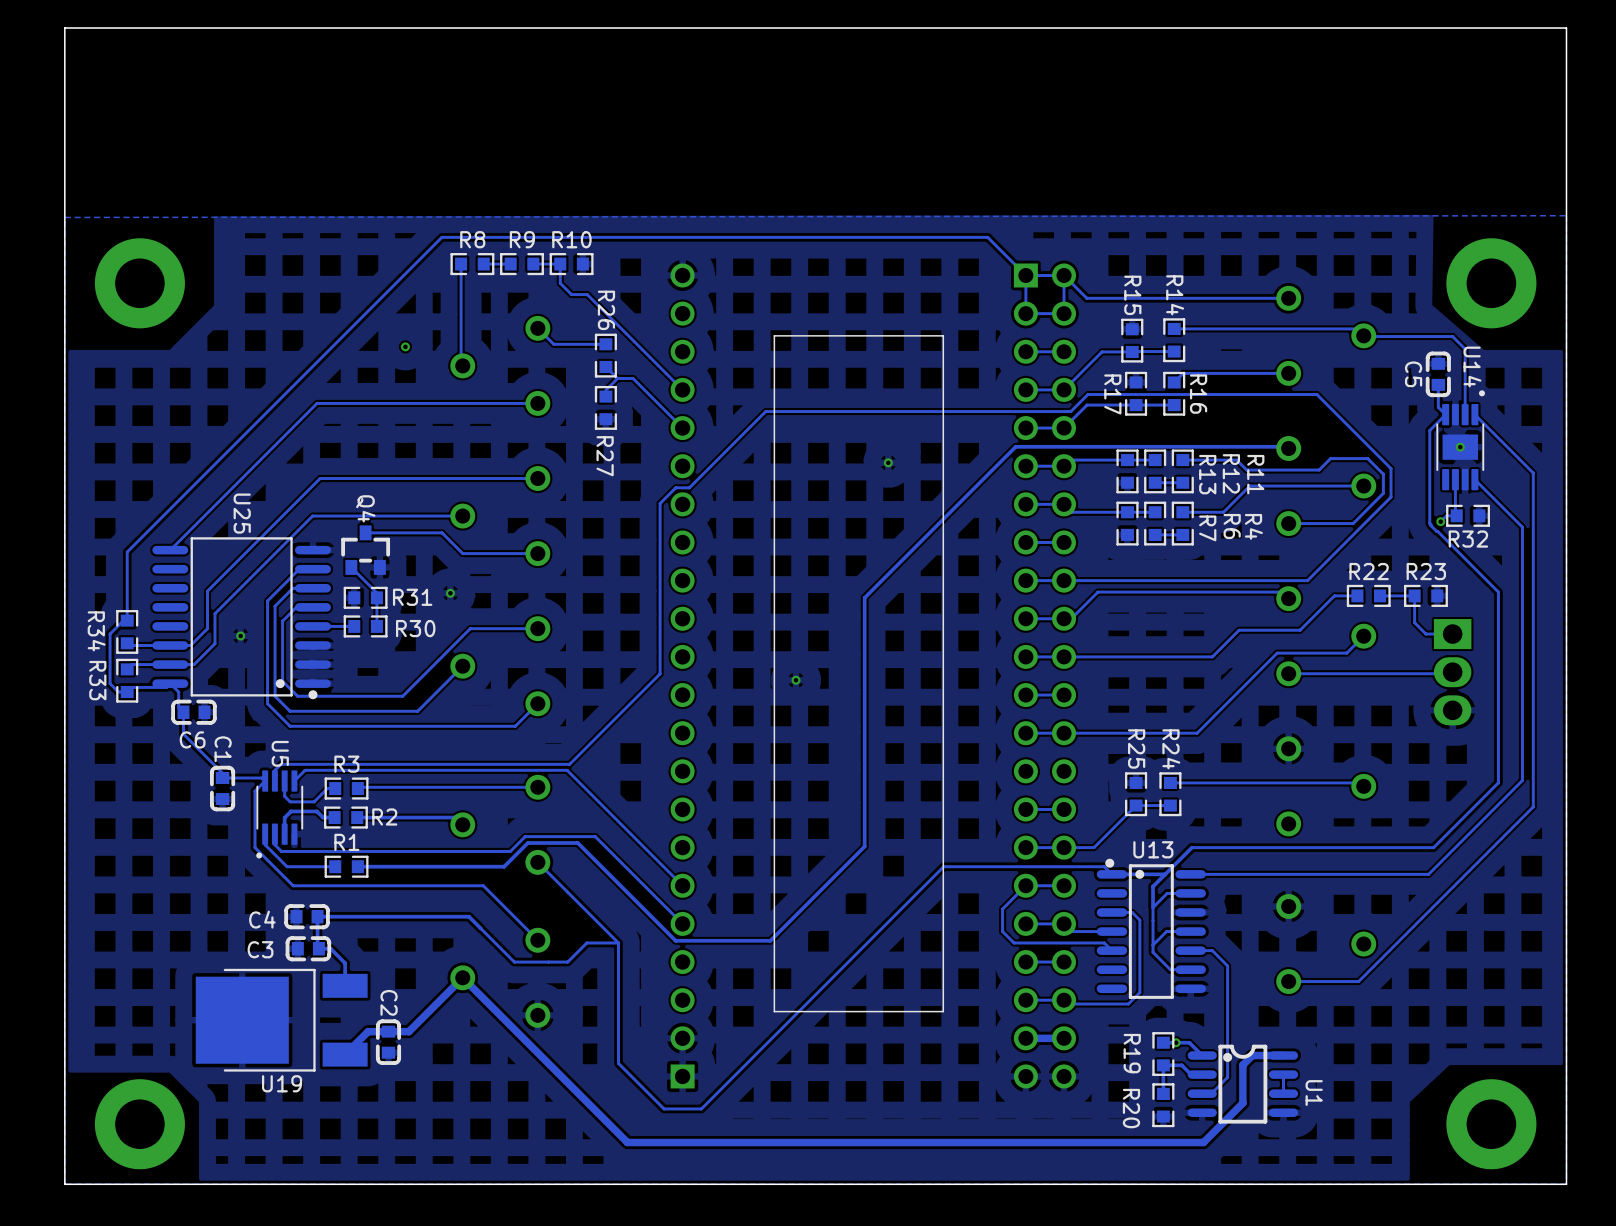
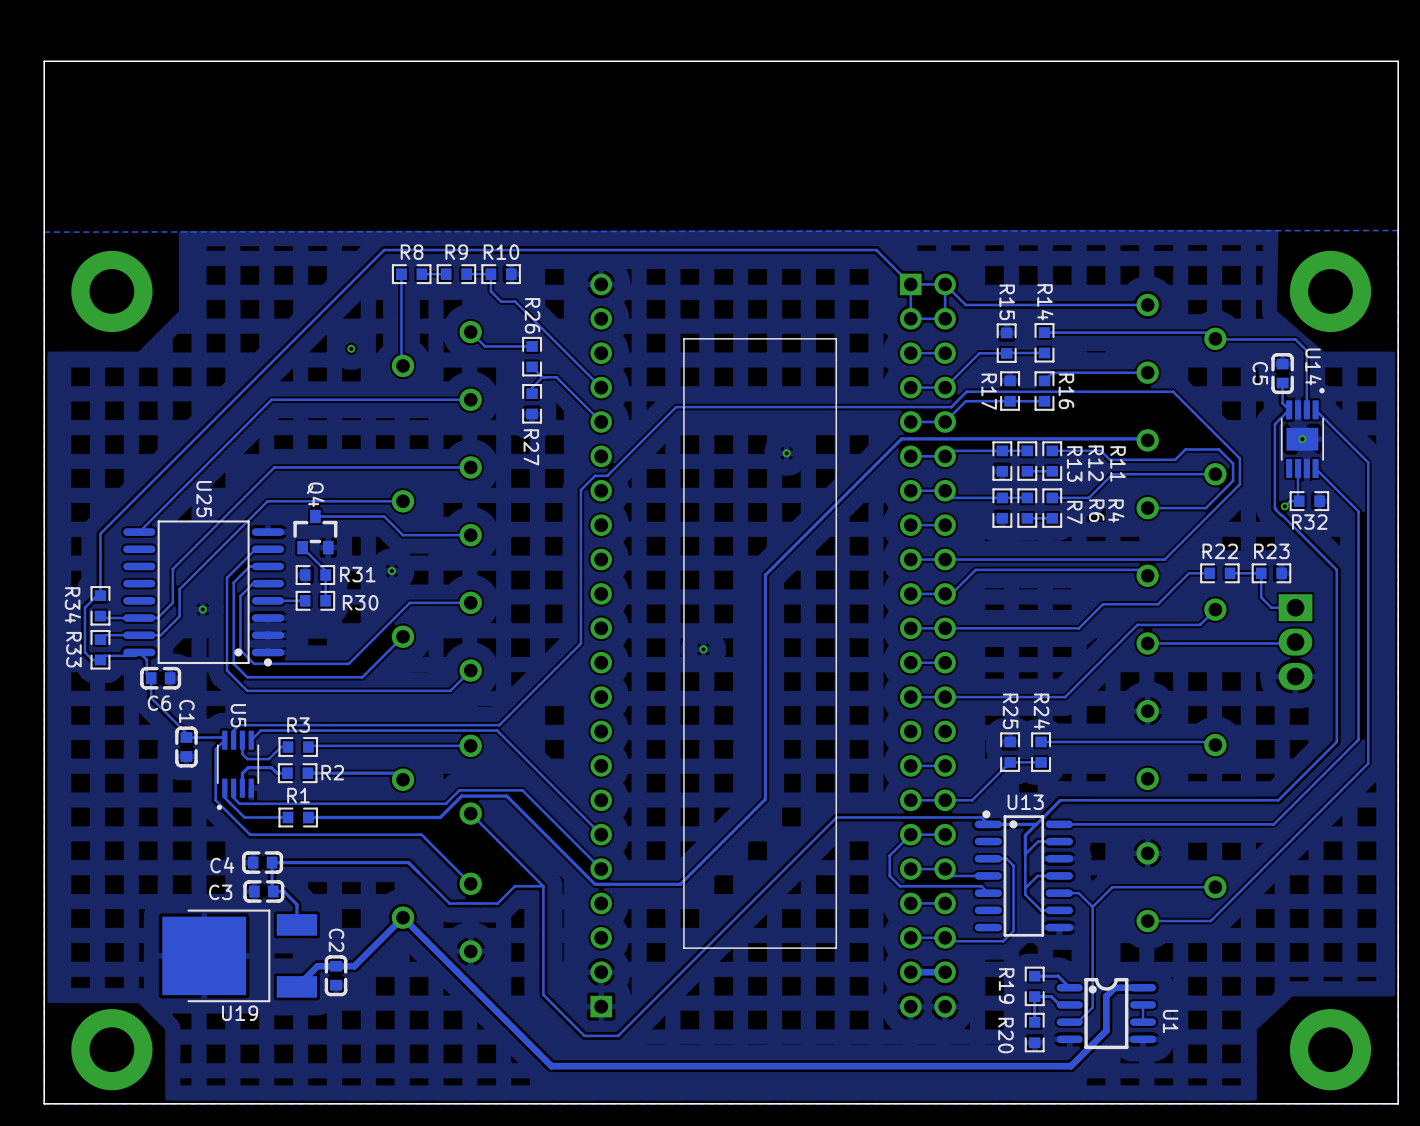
track: none -> (1215, 887) (1112, 887) (1092, 906)
via: (1176, 1042) -> none

